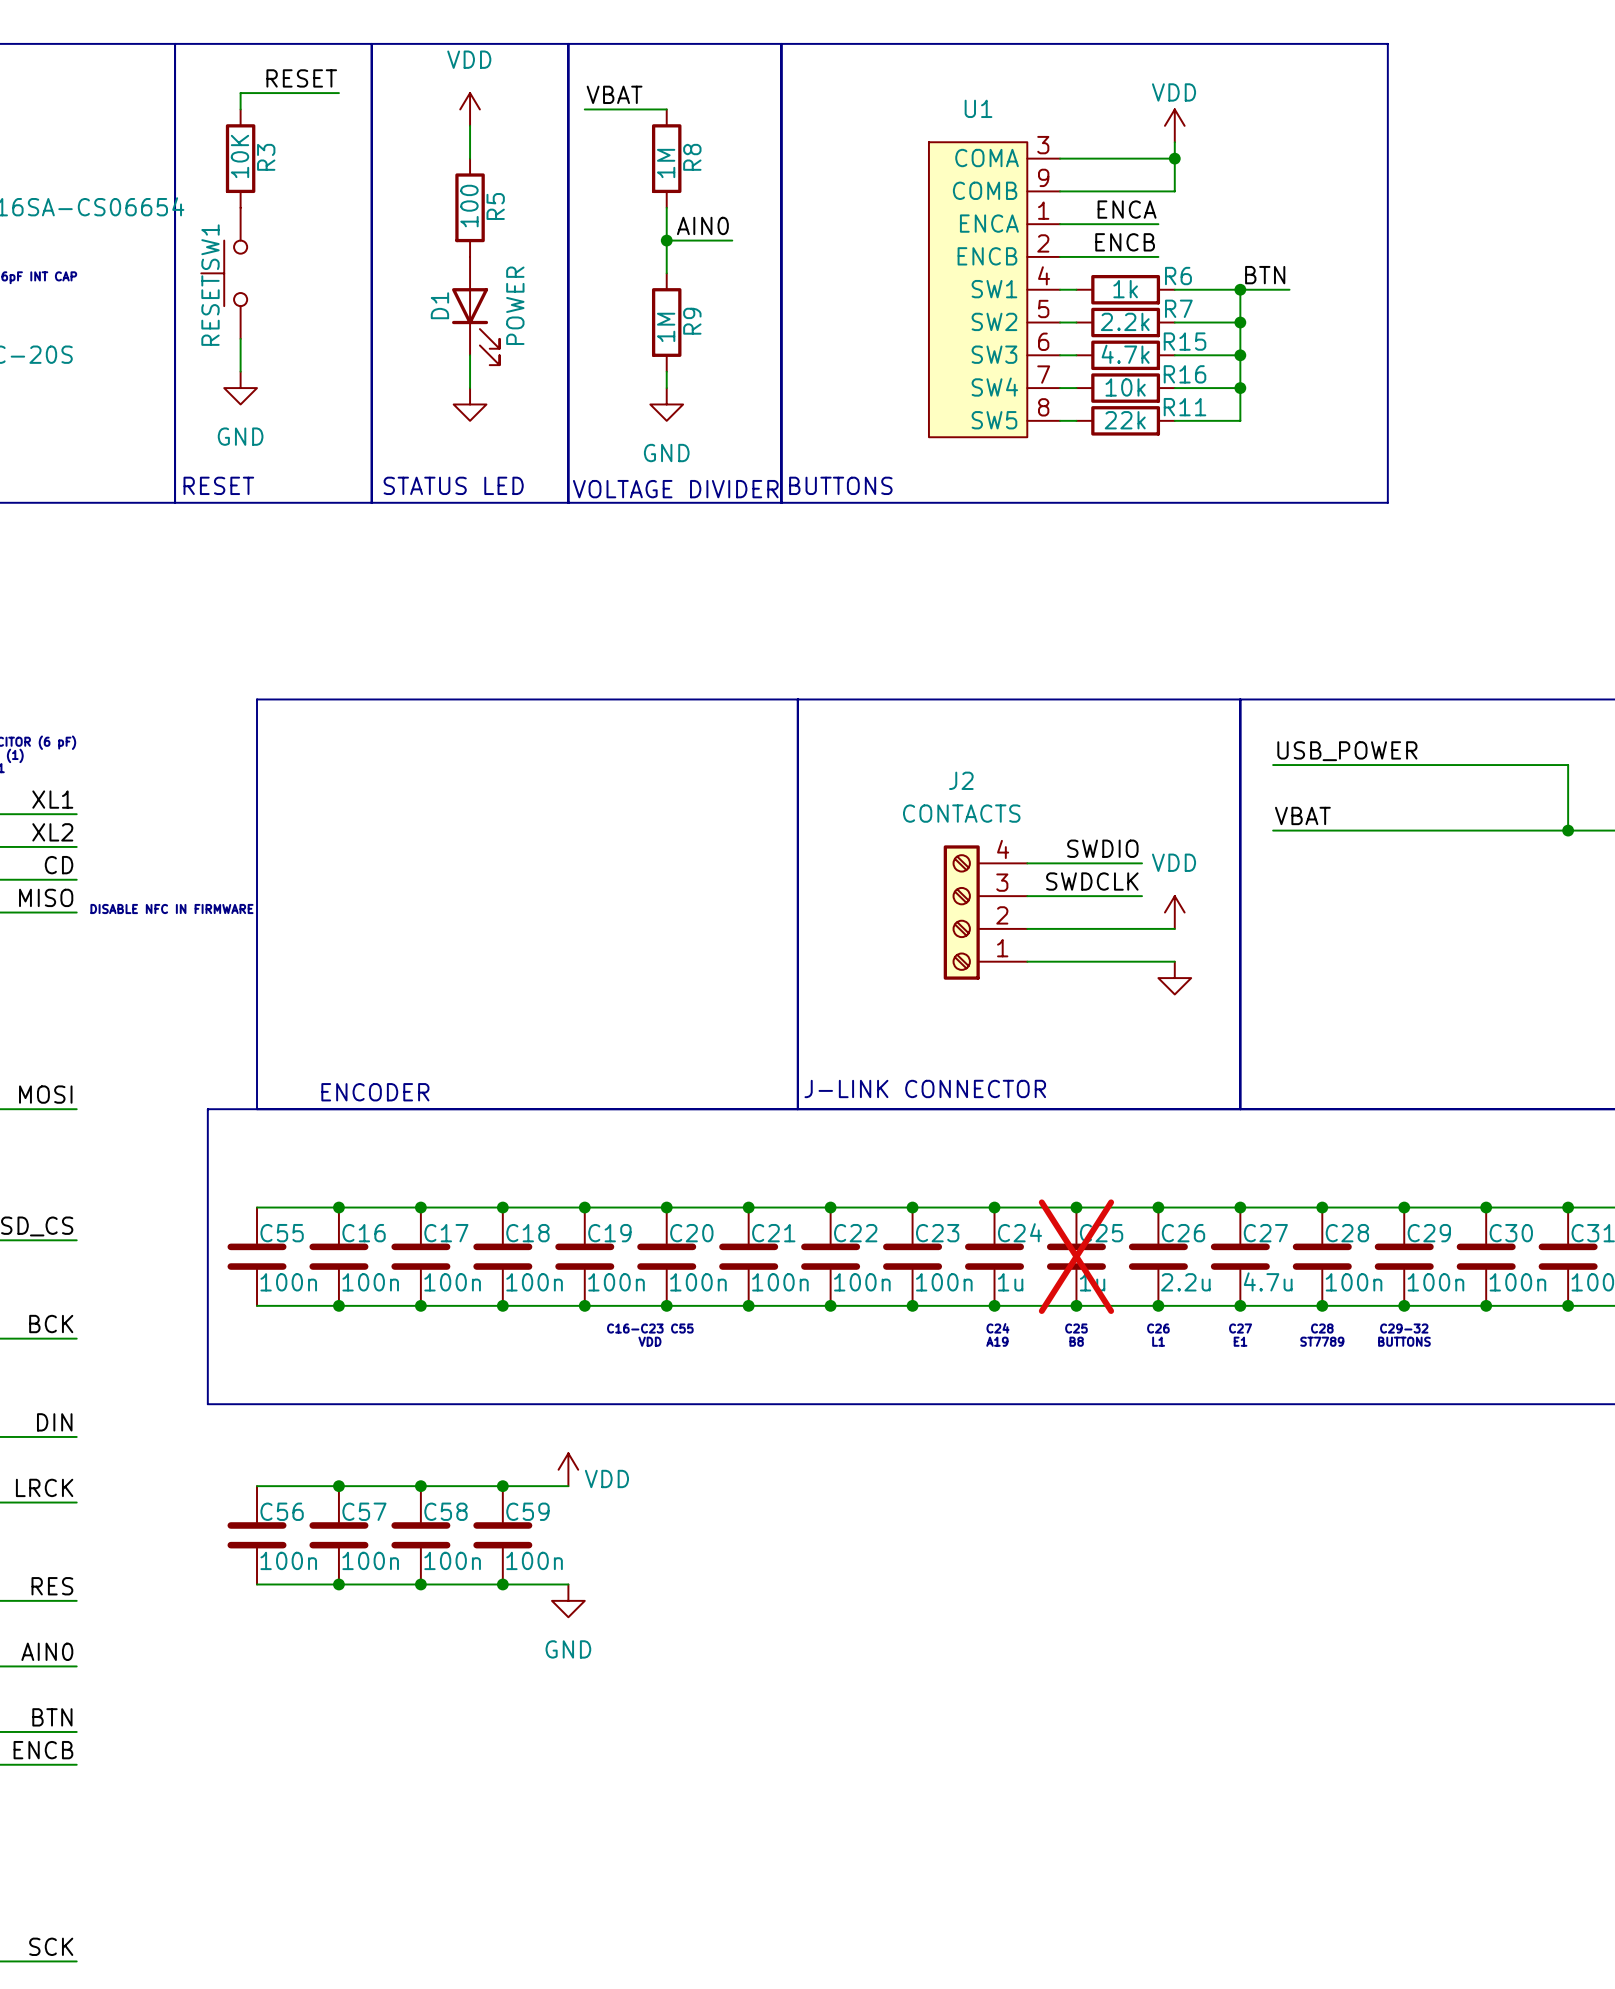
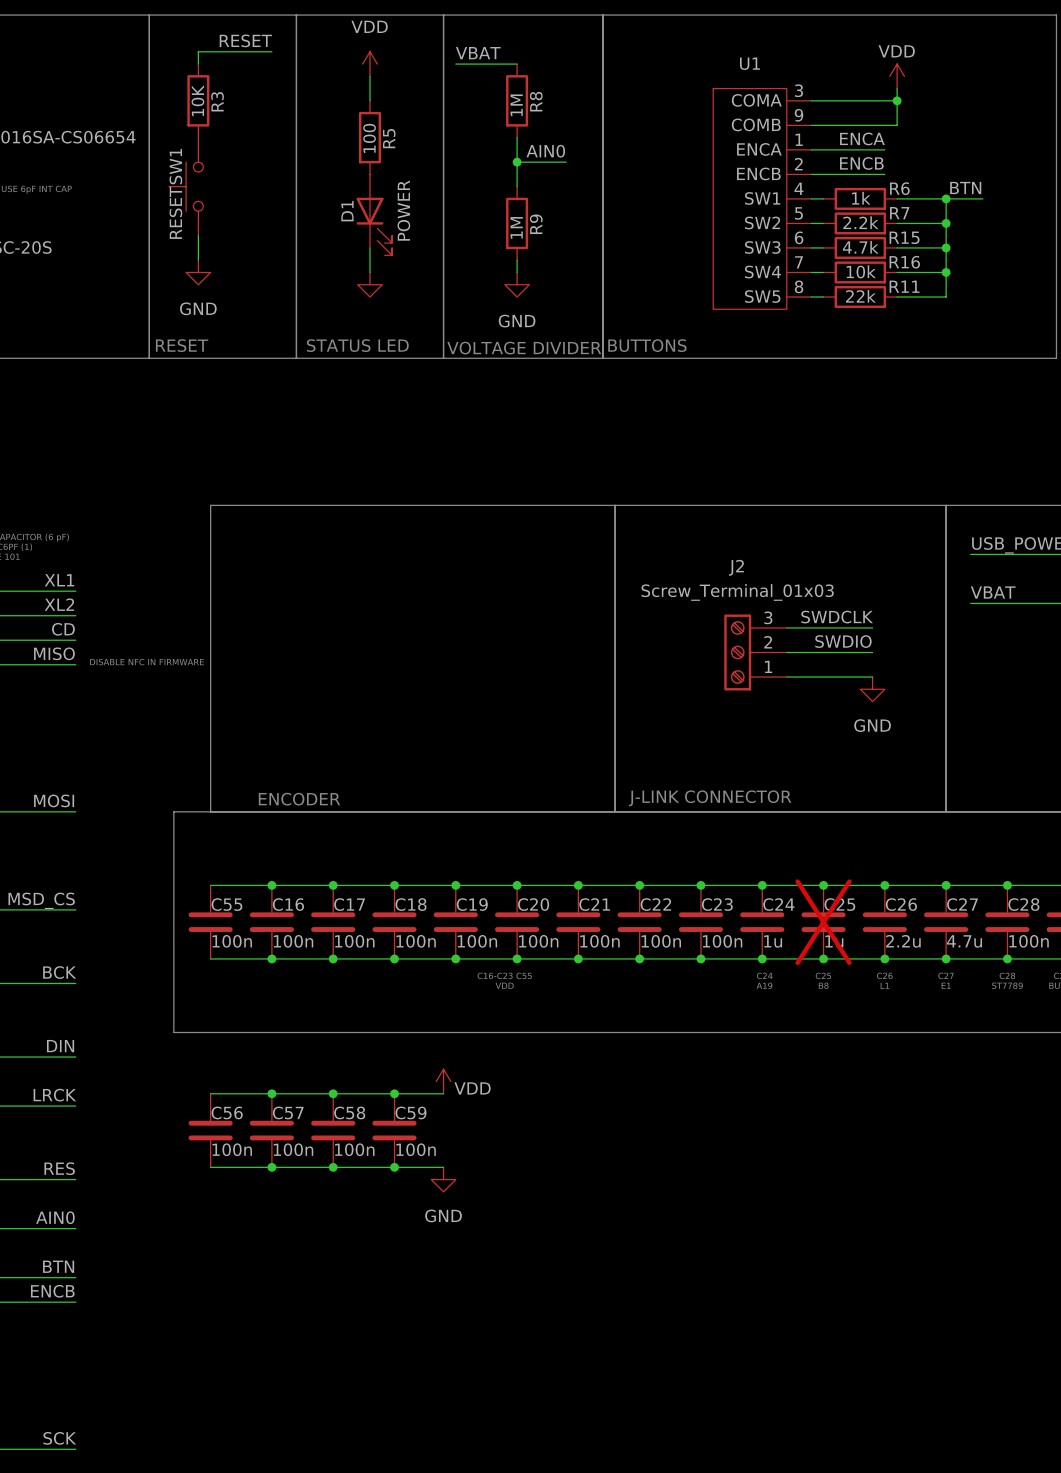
J2 value: CONTACTS (961, 813) -> Screw_Terminal_01x03 (737, 592)
J2 symbol: [943, 845, 1028, 980] -> [724, 614, 787, 691]
label: SWDIO (1102, 848) -> SWDCLK (837, 617)
label: SWDCLK (1092, 881) -> SWDIO (843, 641)
power symbol: VDD (1174, 912) -> none
wire: (1142, 928) (1174, 928) -> none
power symbol: none -> GND (872, 689)
wire: (1027, 961) (1174, 961) -> none
power symbol: (1174, 978) -> none

